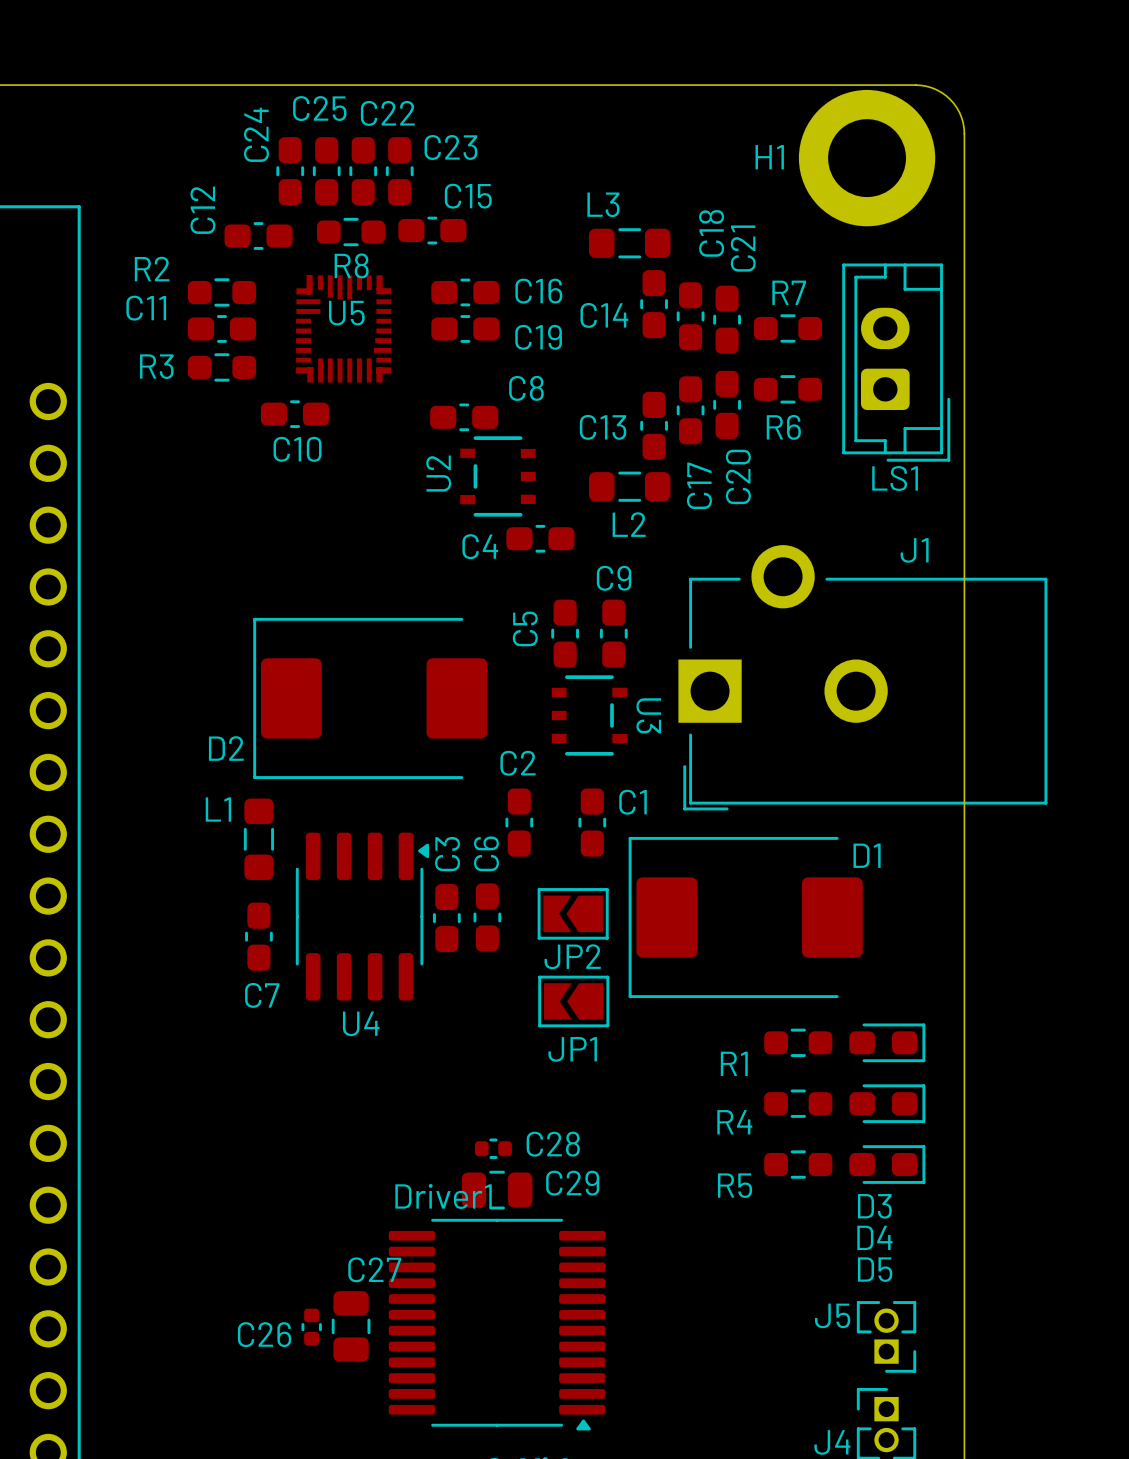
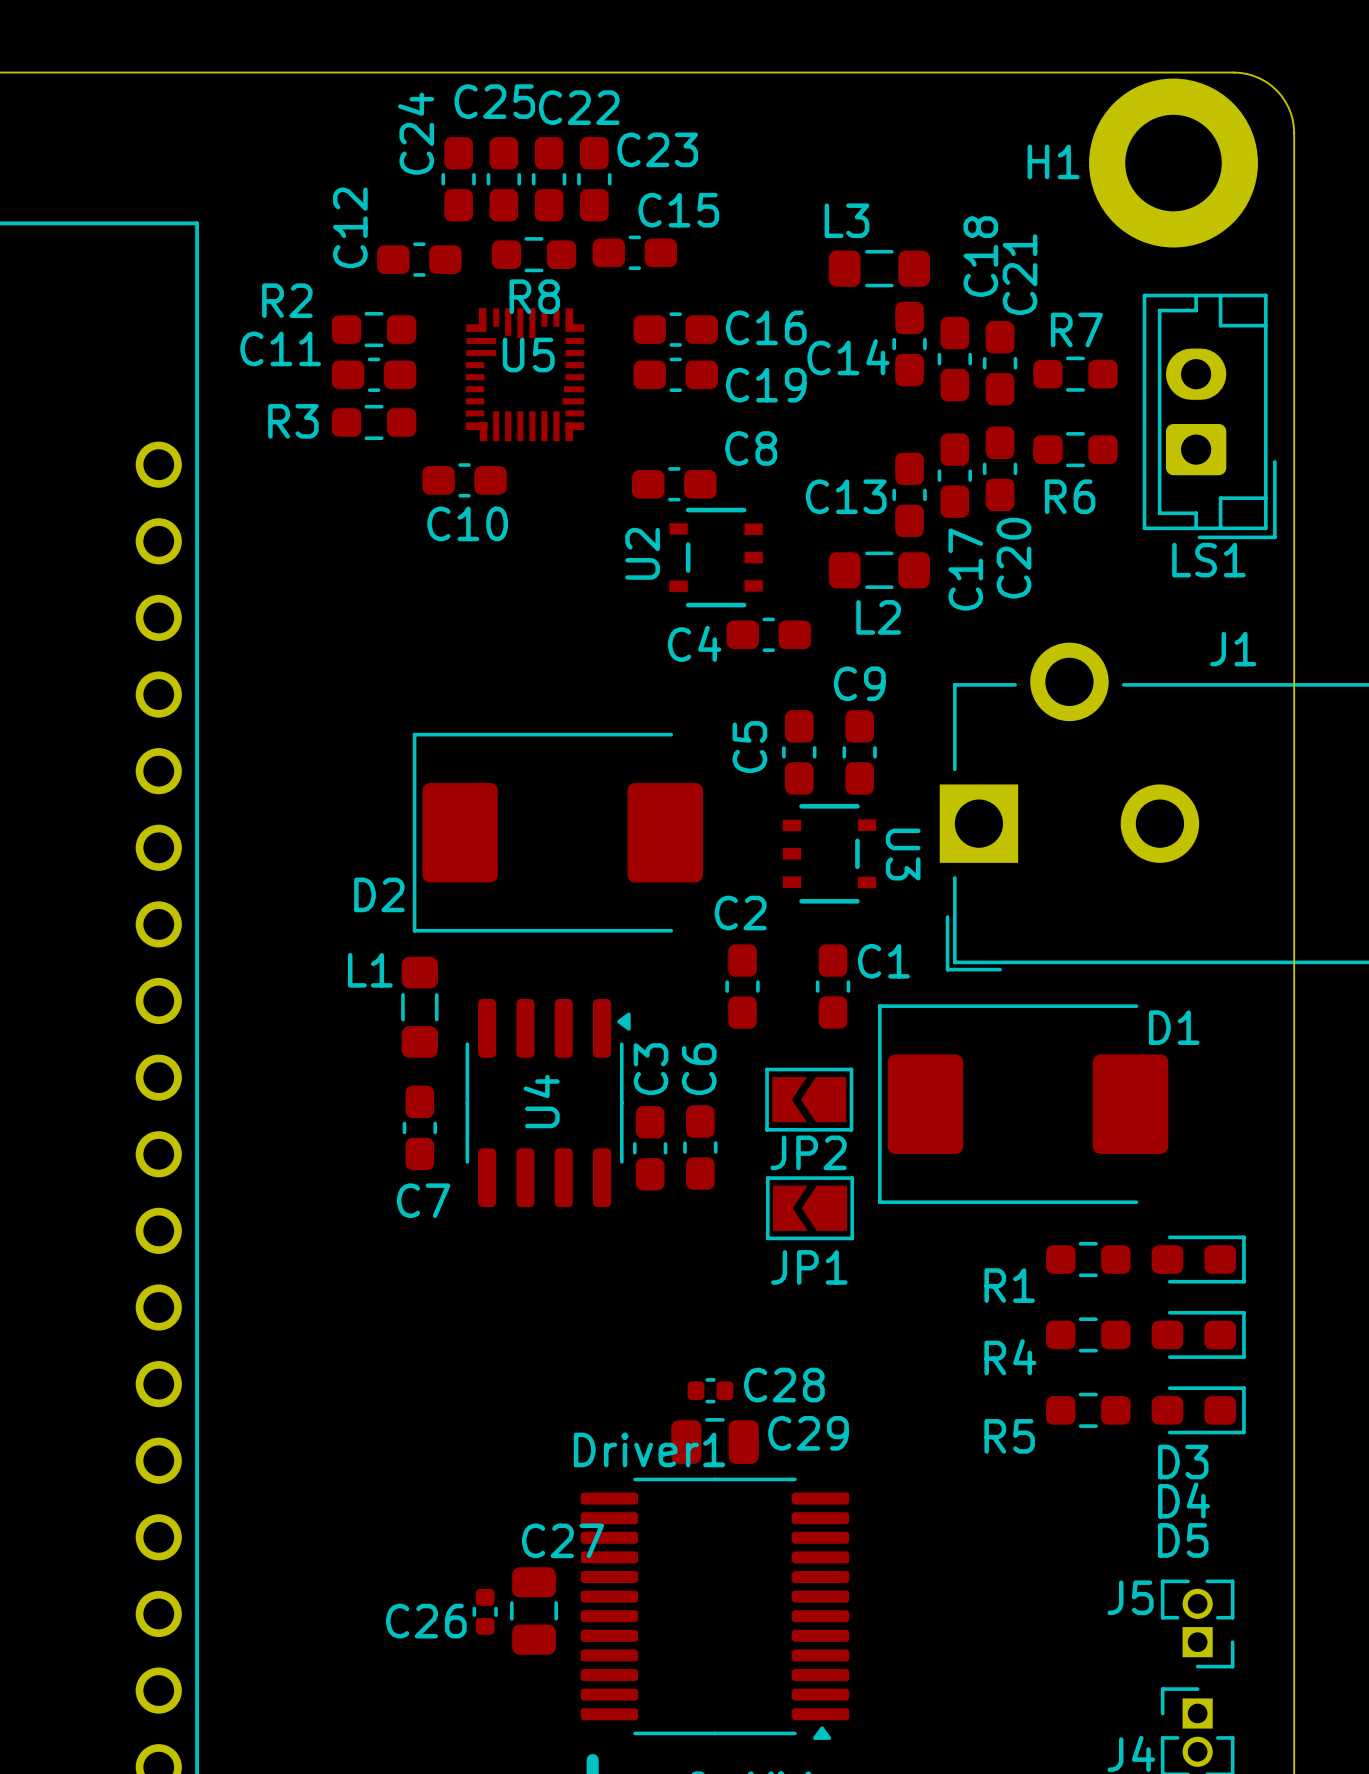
C6 position: (487, 917) -> (700, 1147)
C3 position: (446, 918) -> (650, 1148)
U4 name rotation: 0° (361, 1023) -> 90° counterclockwise (541, 1101)
U4 name position: U4 (361, 1023) -> U4 (541, 1101)

